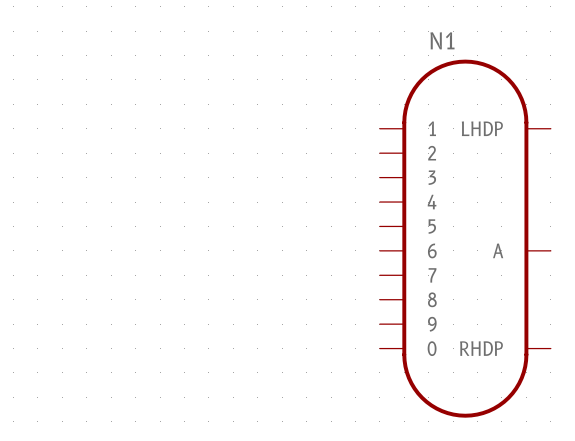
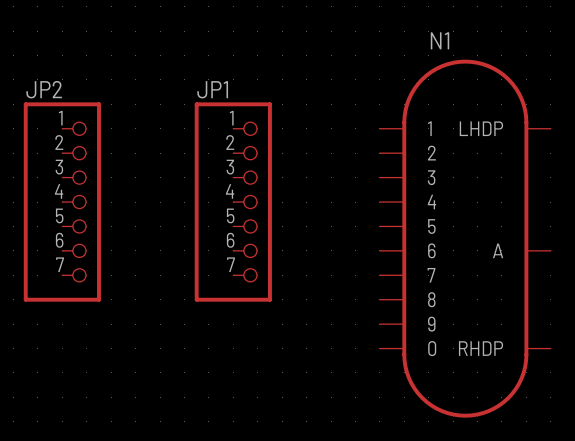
JP2: none -> (62, 202)
JP1: none -> (233, 202)

